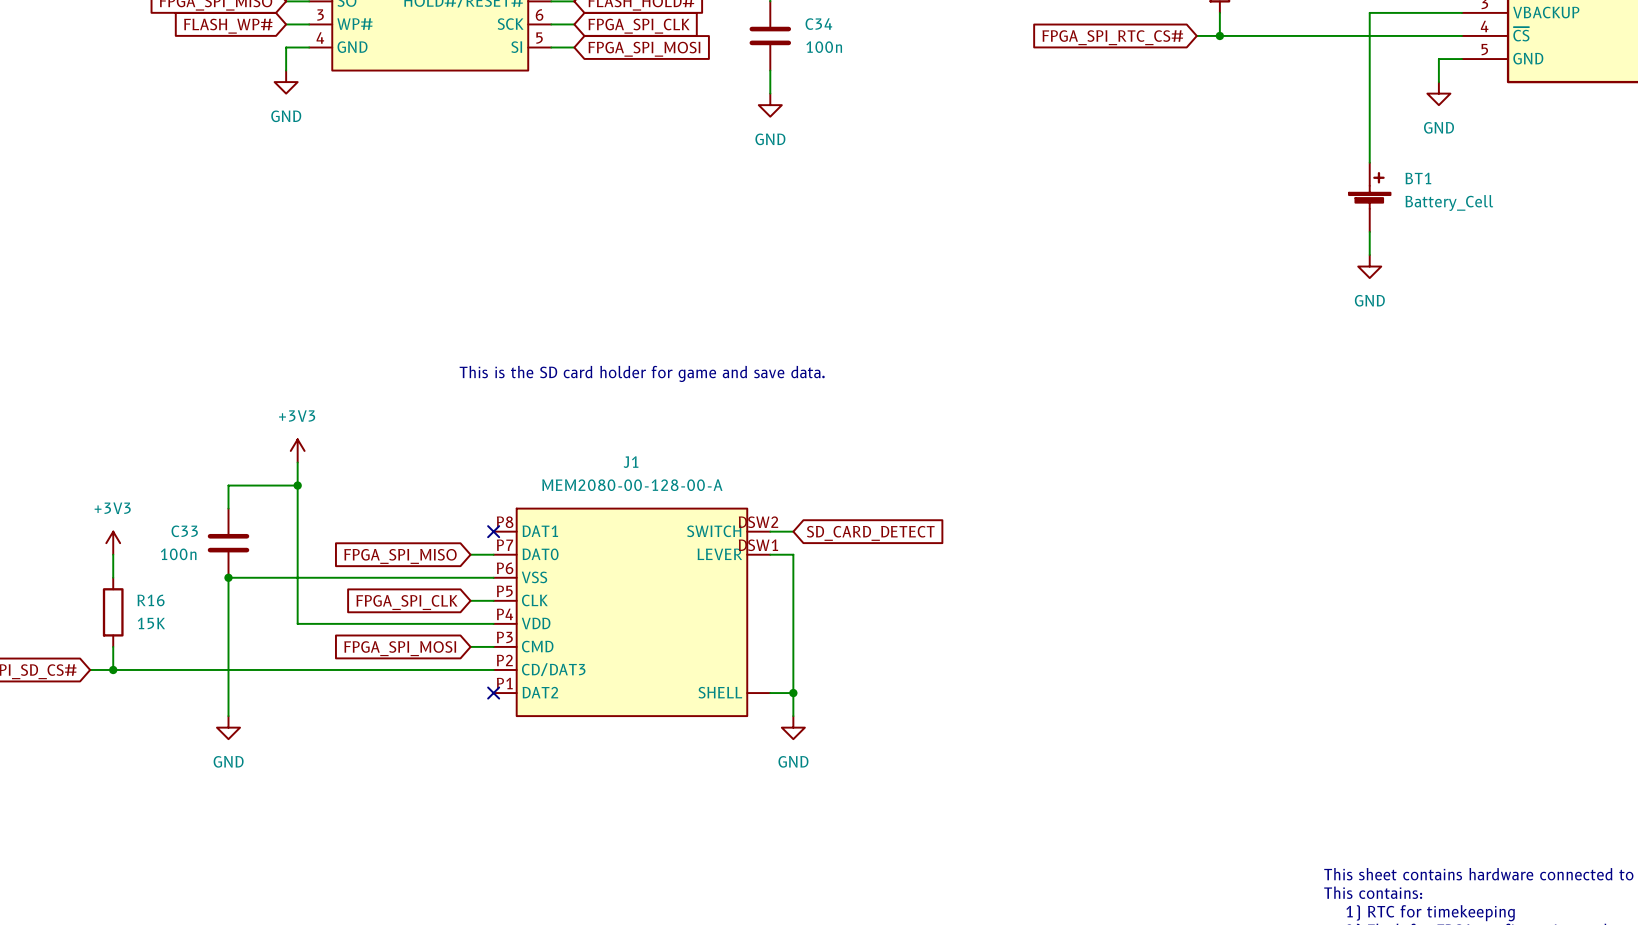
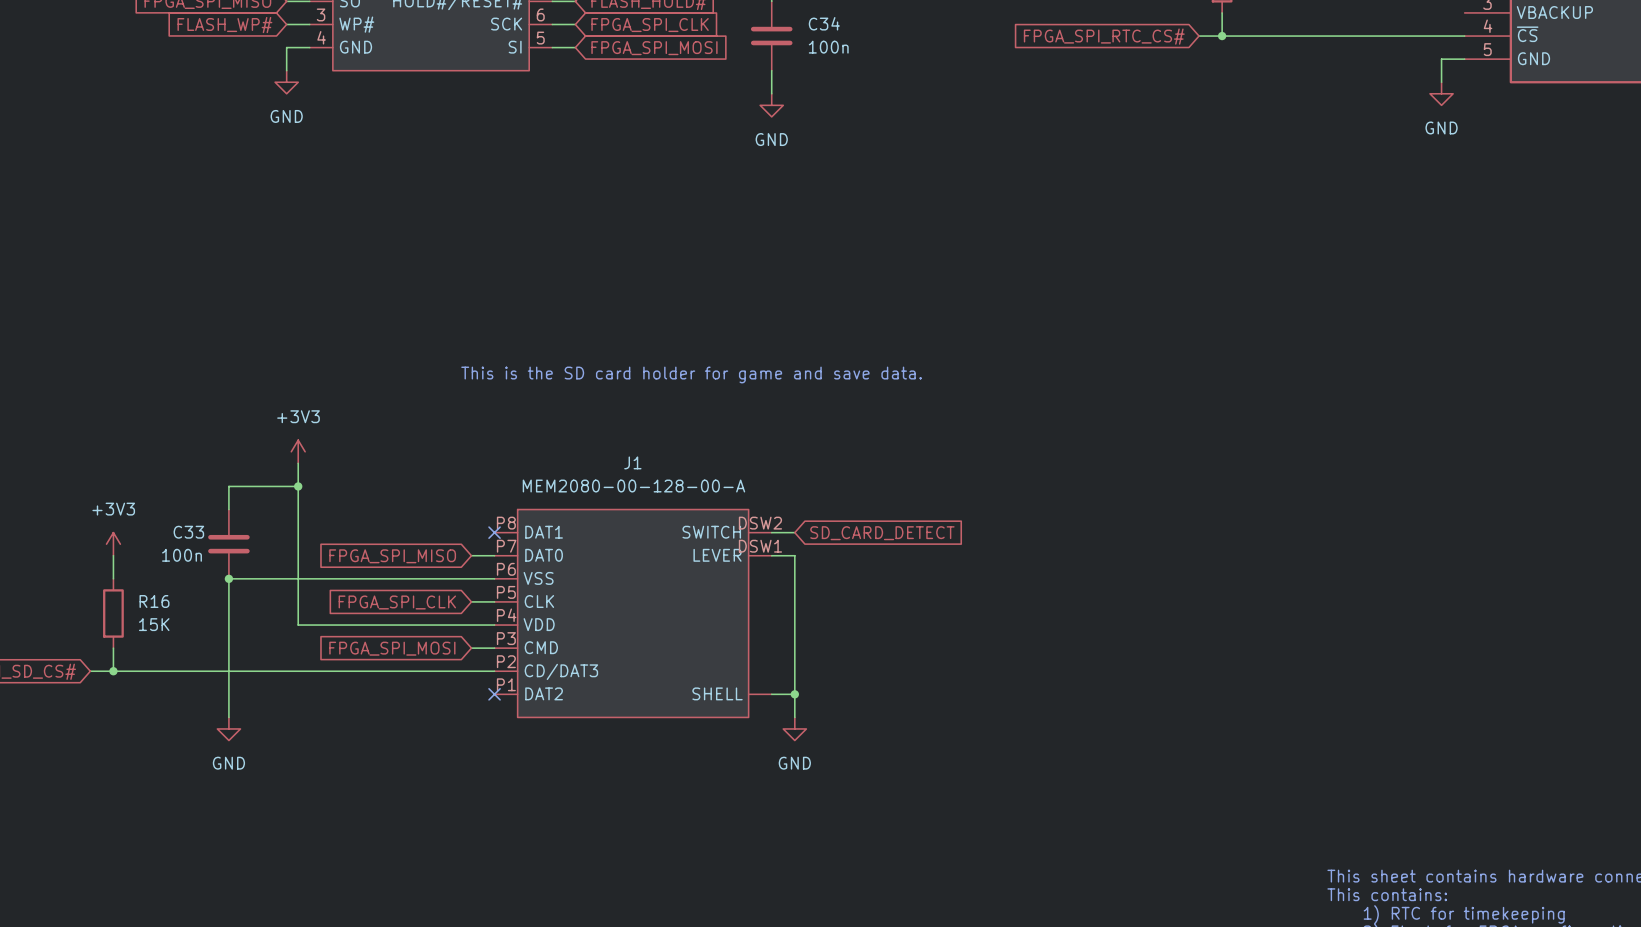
wire: (1461, 12) (1369, 12) (1369, 162) -> none
BT1: Battery_Cell (1369, 197) -> none
wire: (1369, 231) (1369, 255) -> none
power symbol: GND (1369, 266) -> none

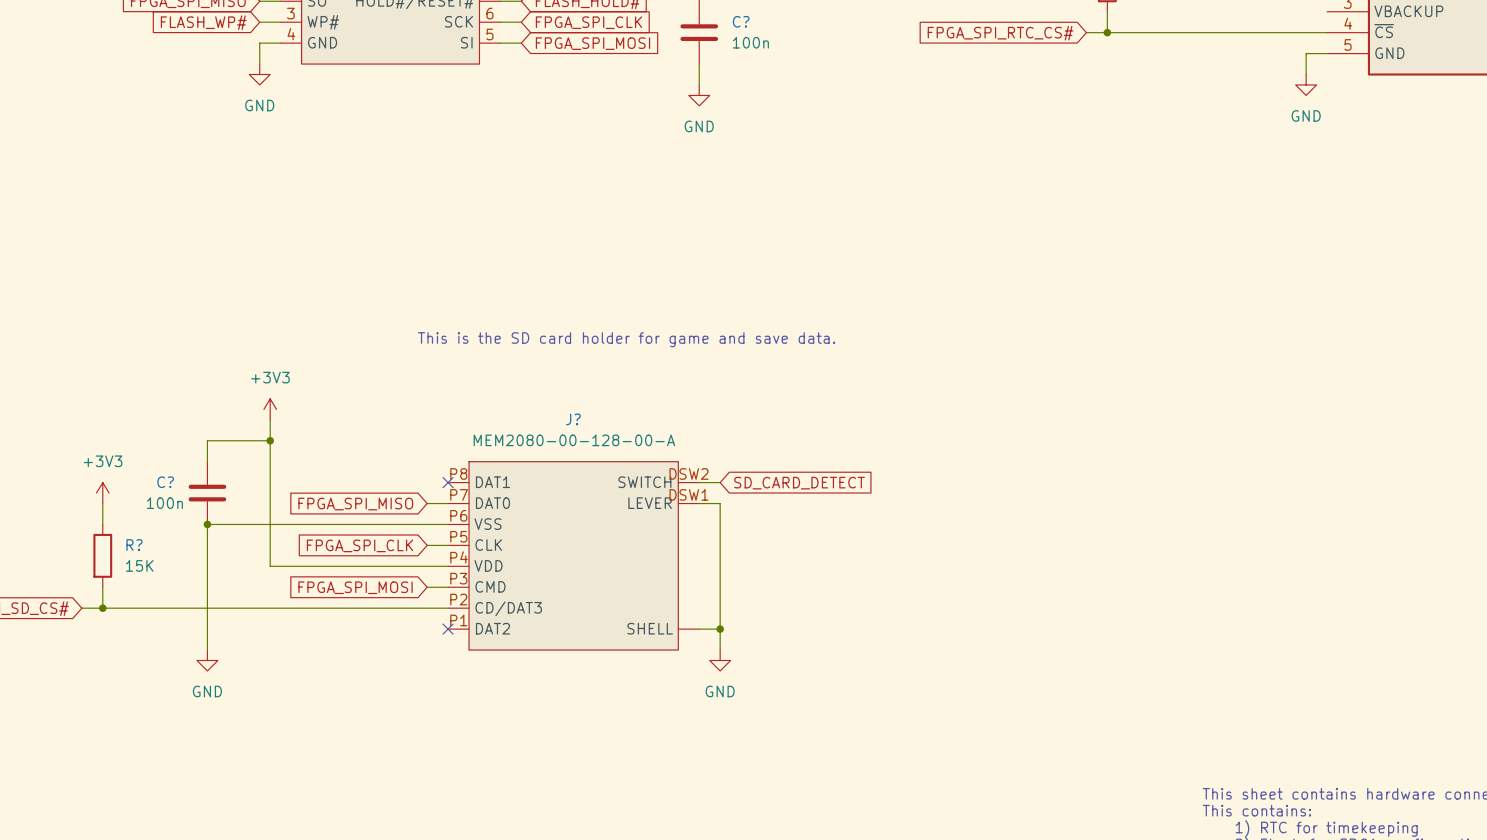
C34 name: C34 (824, 23) -> C? (741, 21)
J1 name: J1 (632, 462) -> J? (573, 419)
C33 name: C33 (188, 532) -> C? (165, 482)
R16 name: R16 (154, 601) -> R? (134, 545)

